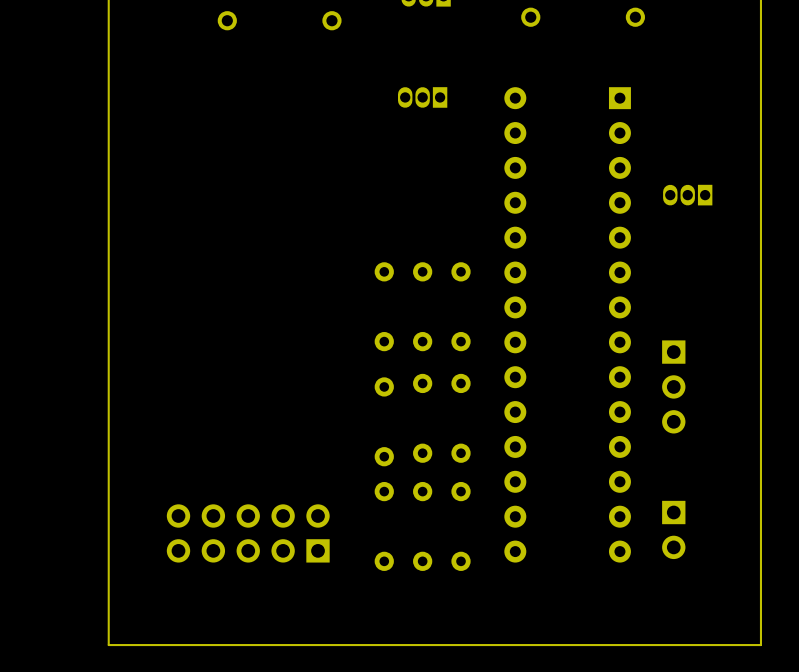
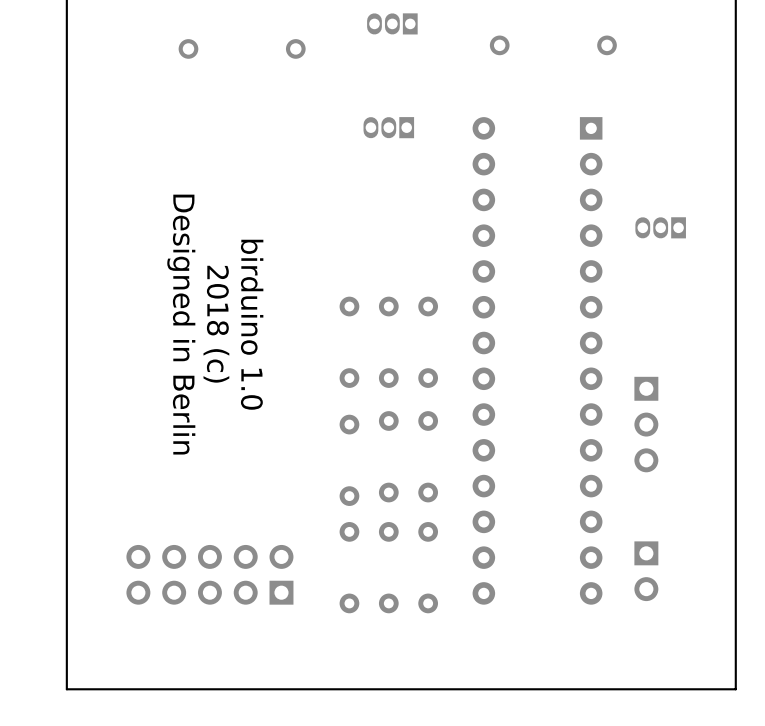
text: none -> 2018 (c) (216, 324)
text: none -> Designed in Berlin (181, 324)
text: none -> birduino 1.0 (252, 324)

